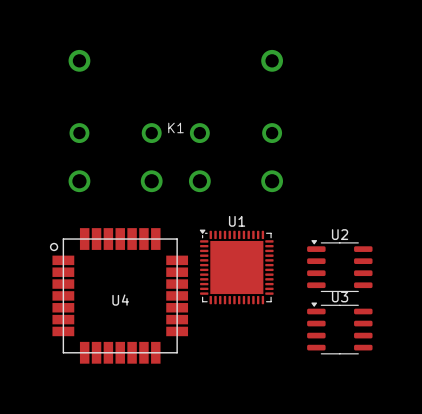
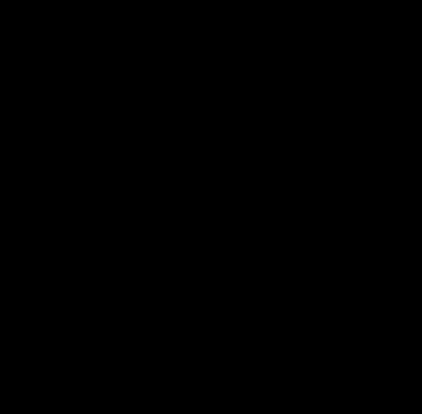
K1: (175, 121) -> none
U1: (236, 266) -> none
U2: (339, 266) -> none
U4: (118, 295) -> none
U3: (339, 328) -> none

